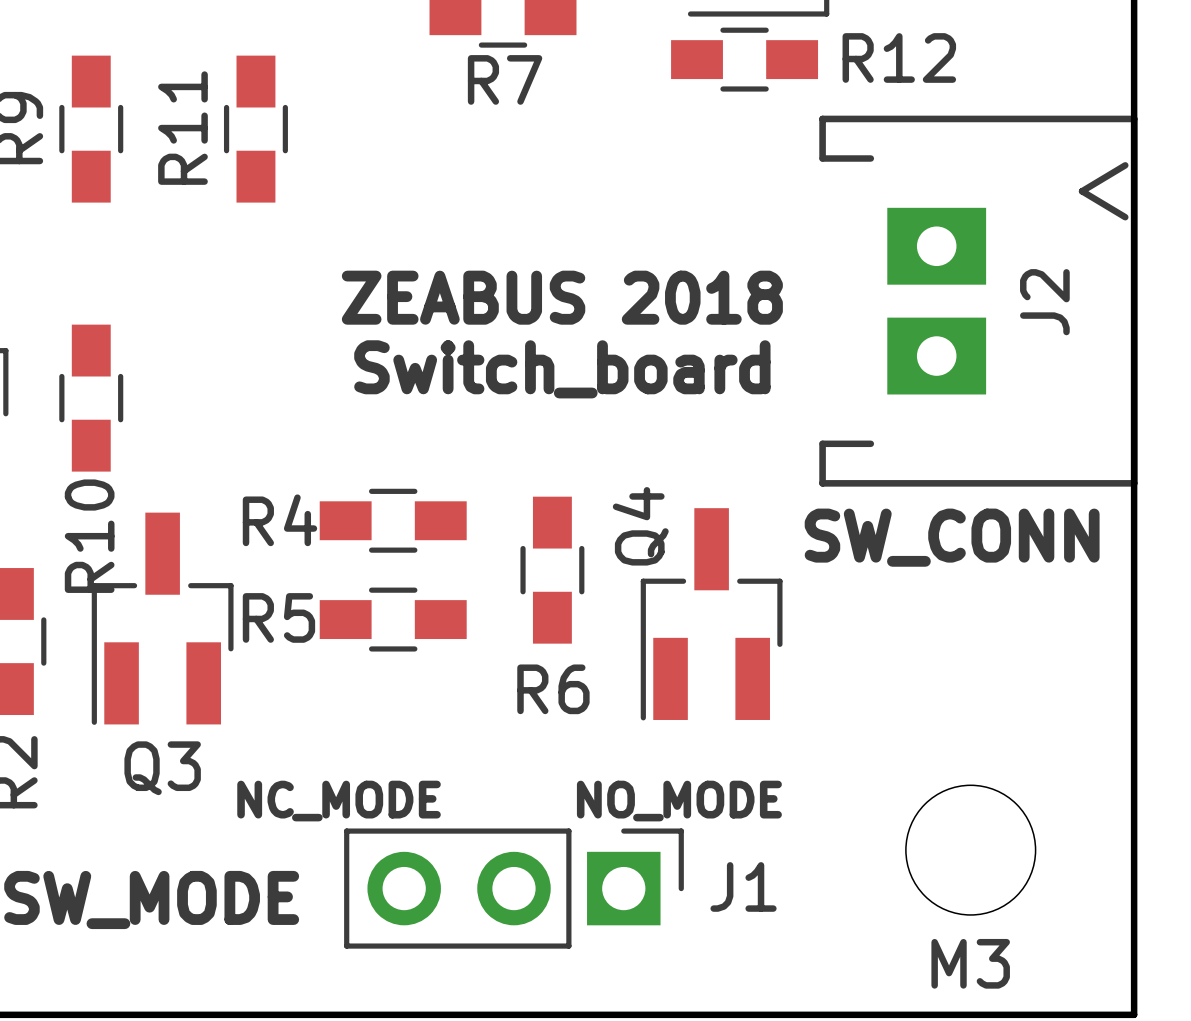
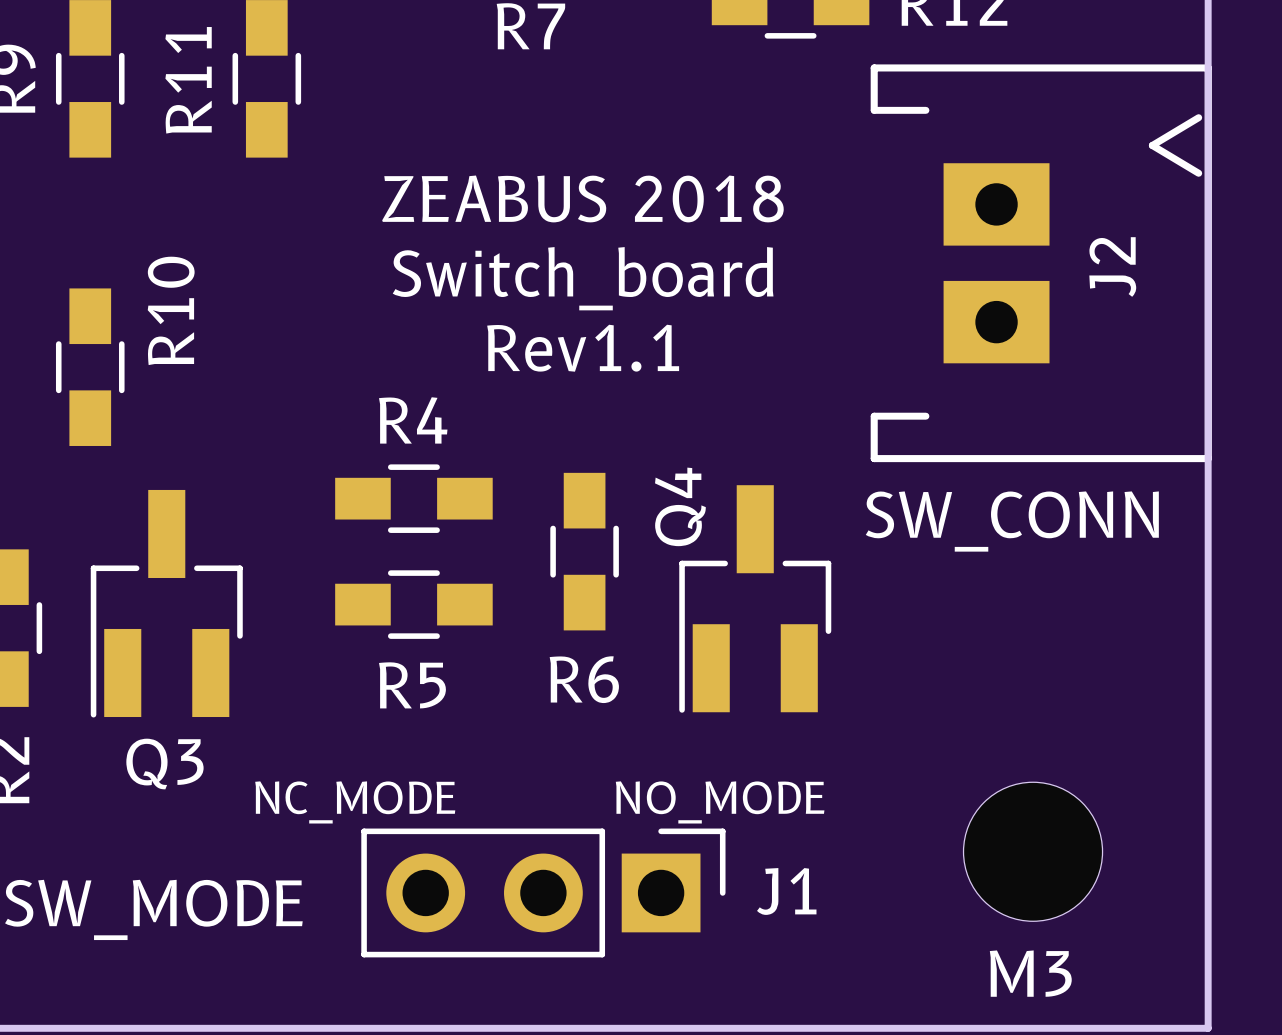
text: none -> ZEABUS 2018 (582, 198)
text: ZEABUS 2018 (562, 297) -> Switch_board (583, 278)
text: Switch_board (562, 369) -> Rev1.1 (583, 348)
R4 name position: R4 (279, 520) -> R4 (413, 420)
R10 name position: R10 (89, 536) -> R10 (171, 310)
R5 name position: R5 (278, 617) -> R5 (412, 685)

